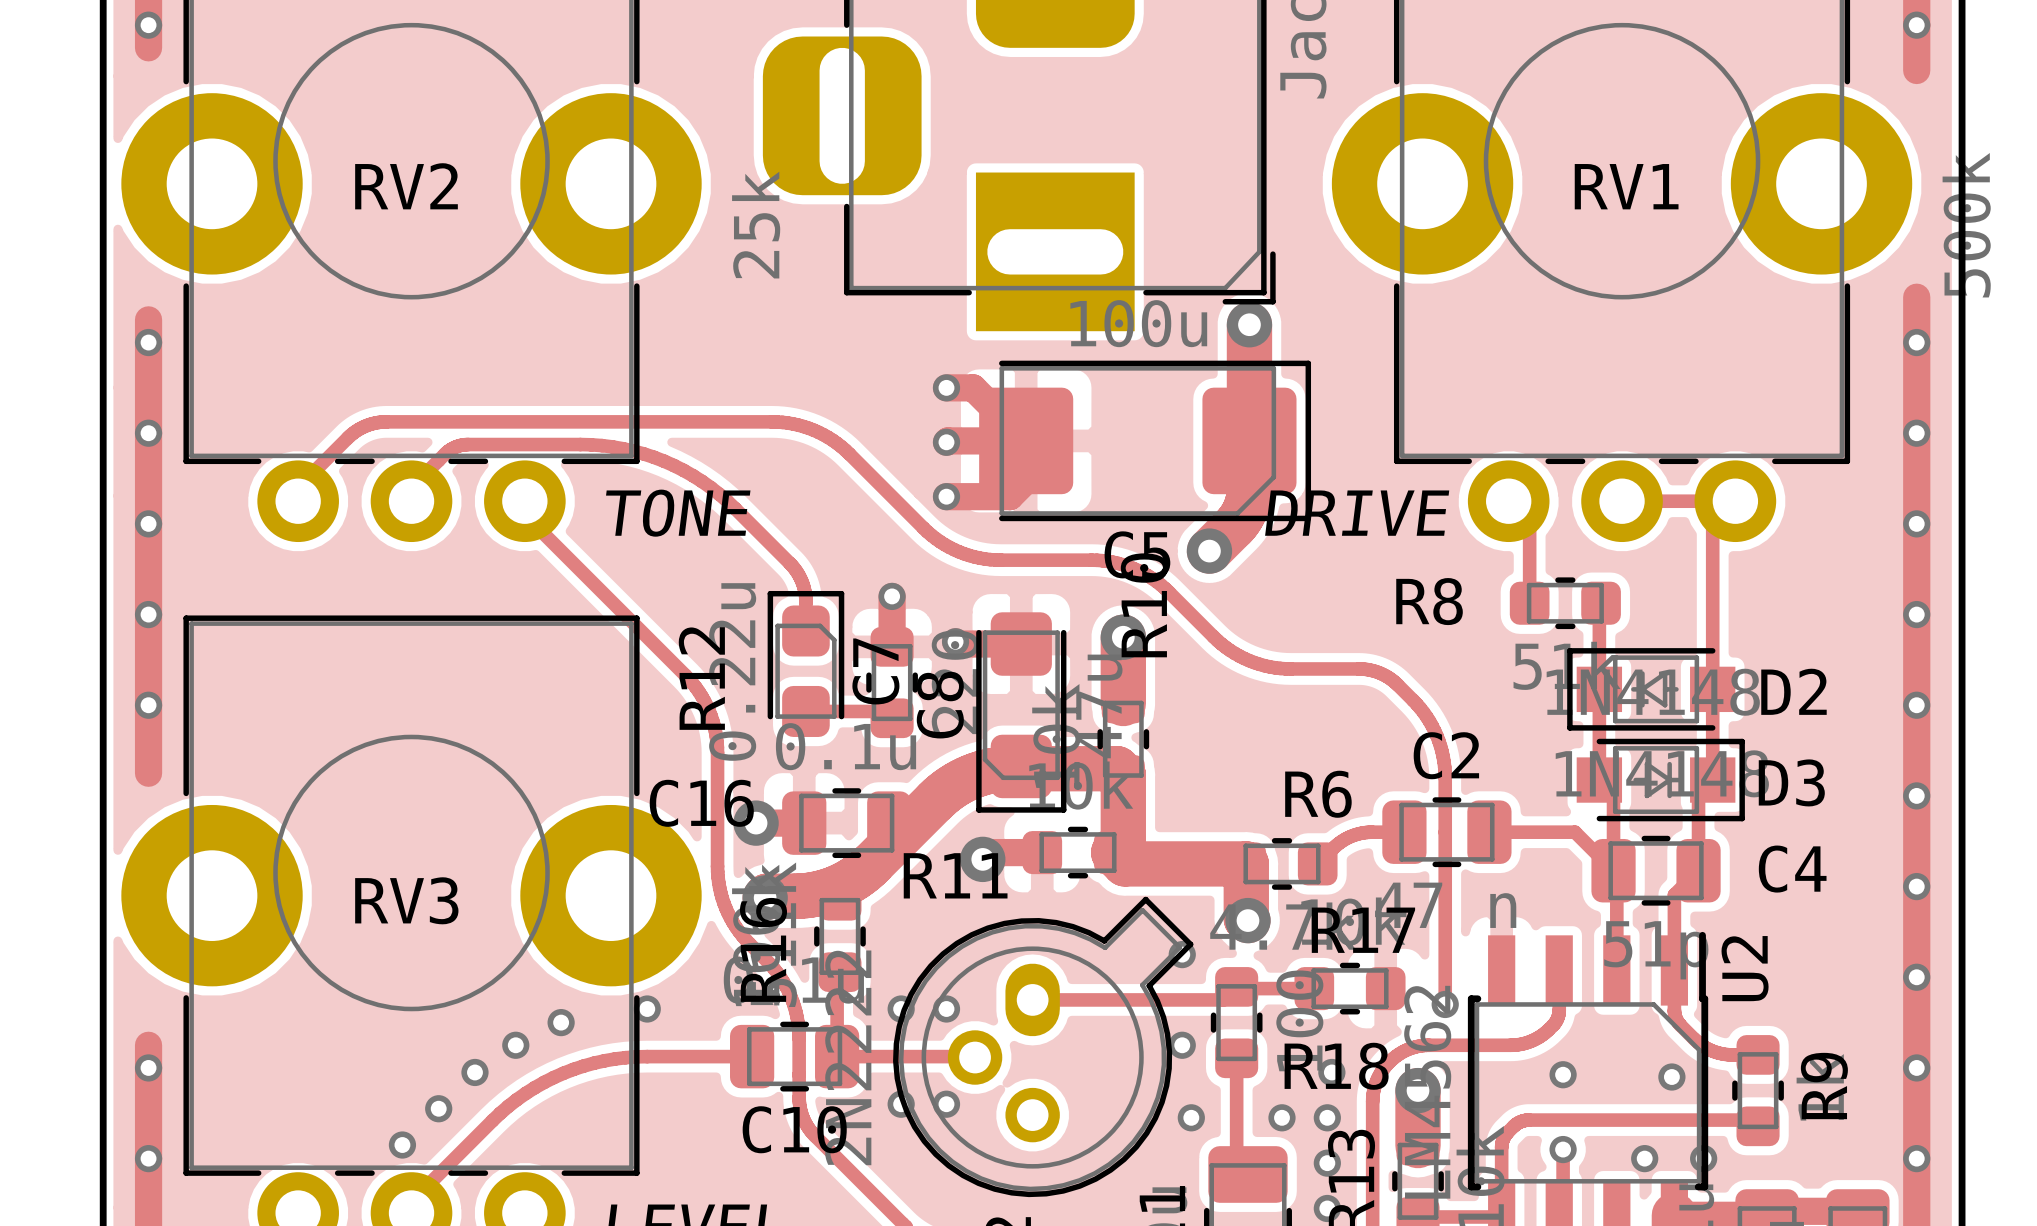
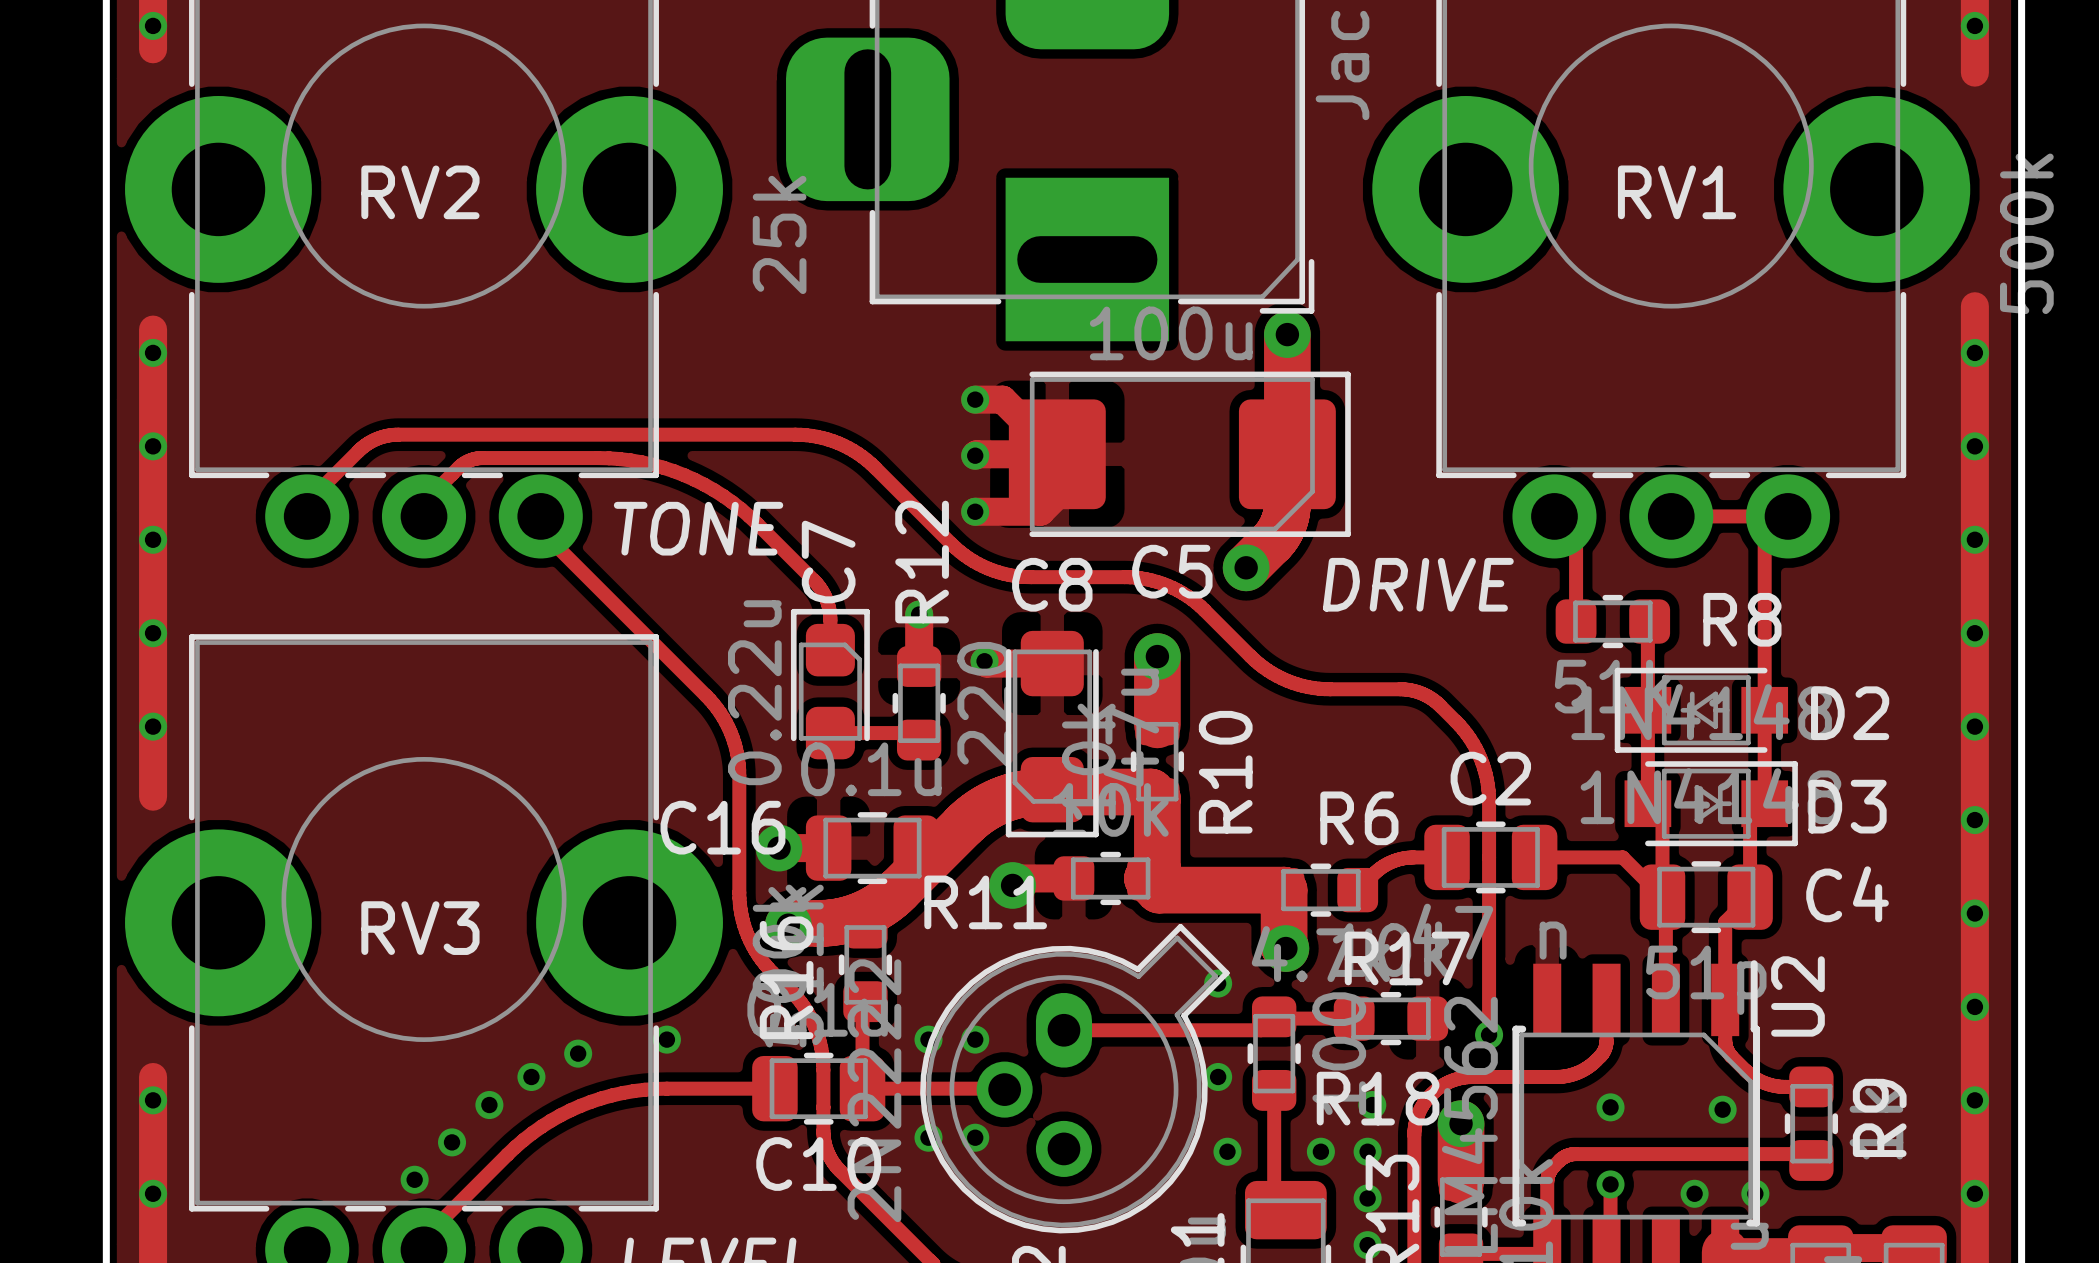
RV1 text position: DRIVE (1357, 513) -> DRIVE (1418, 584)
R8 name position: R8 (1429, 601) -> R8 (1742, 619)
R10 name position: R10 (1144, 605) -> R10 (1225, 772)
C7 name position: C7 (875, 671) -> C7 (828, 562)
R12 name position: R12 (701, 678) -> R12 (922, 562)
C8 name rotation: 0° (940, 705) -> 90° clockwise (1052, 584)
C8 name position: C8 (940, 705) -> C8 (1052, 584)

